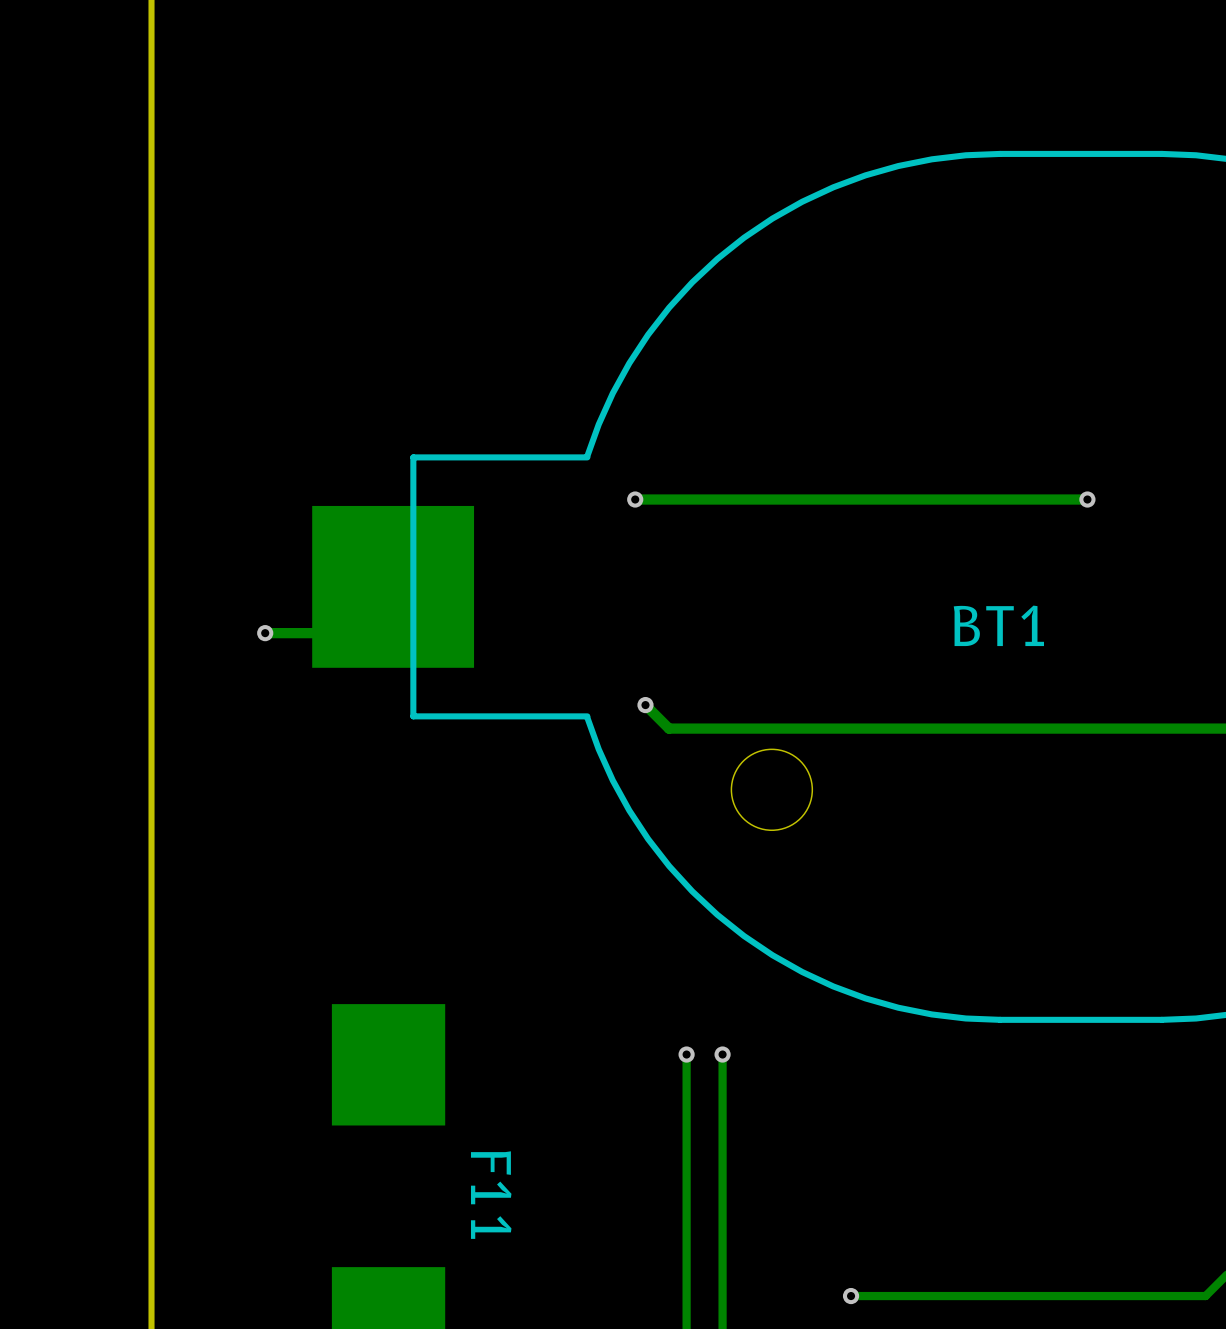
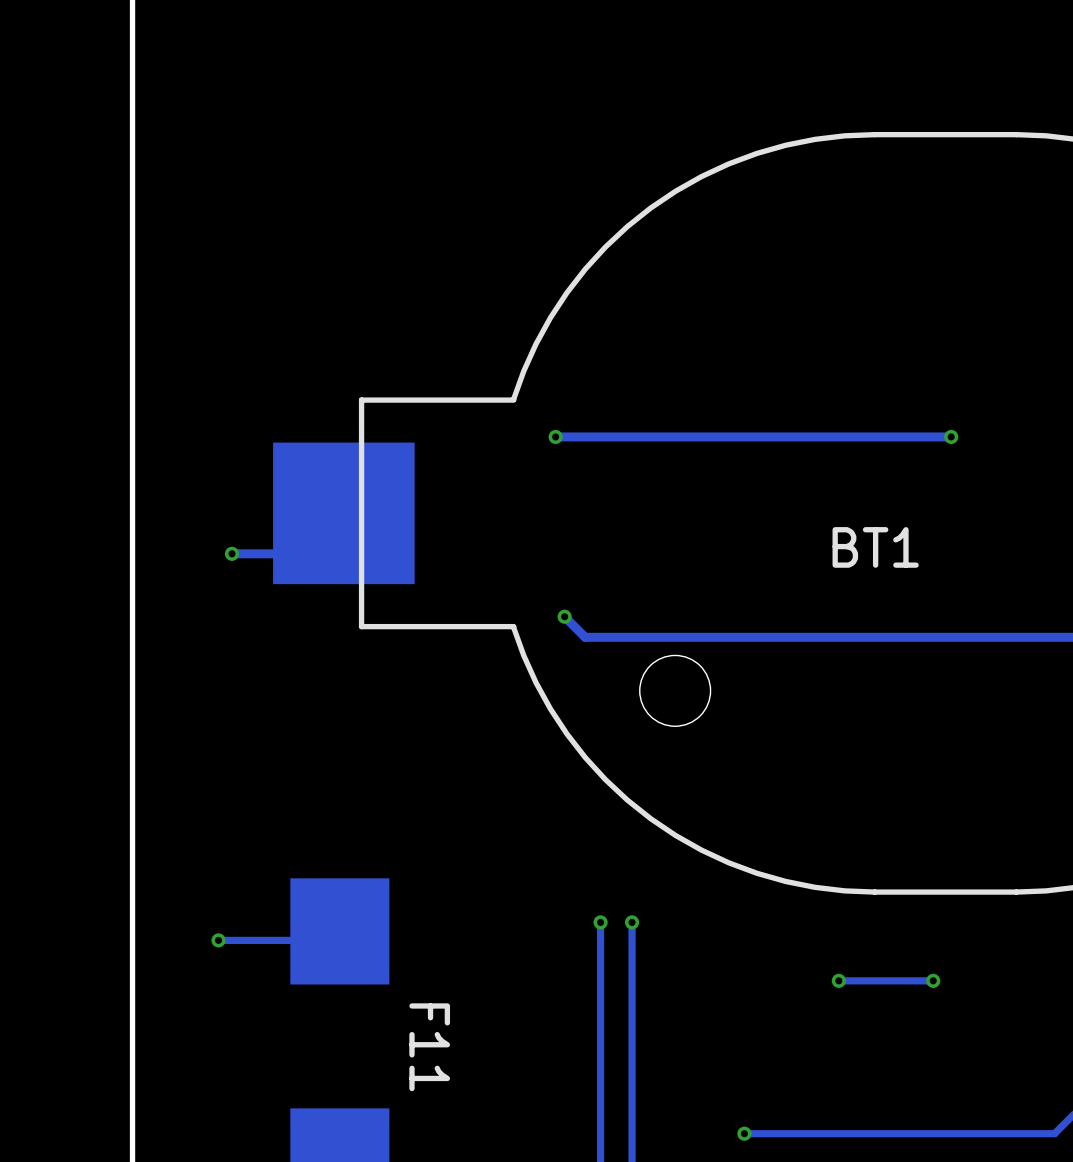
track: none -> (339, 931) (330, 940) (218, 940)
via: none -> (218, 940)
via: none -> (838, 980)
track: none -> (933, 980) (838, 980)
via: none -> (933, 980)

